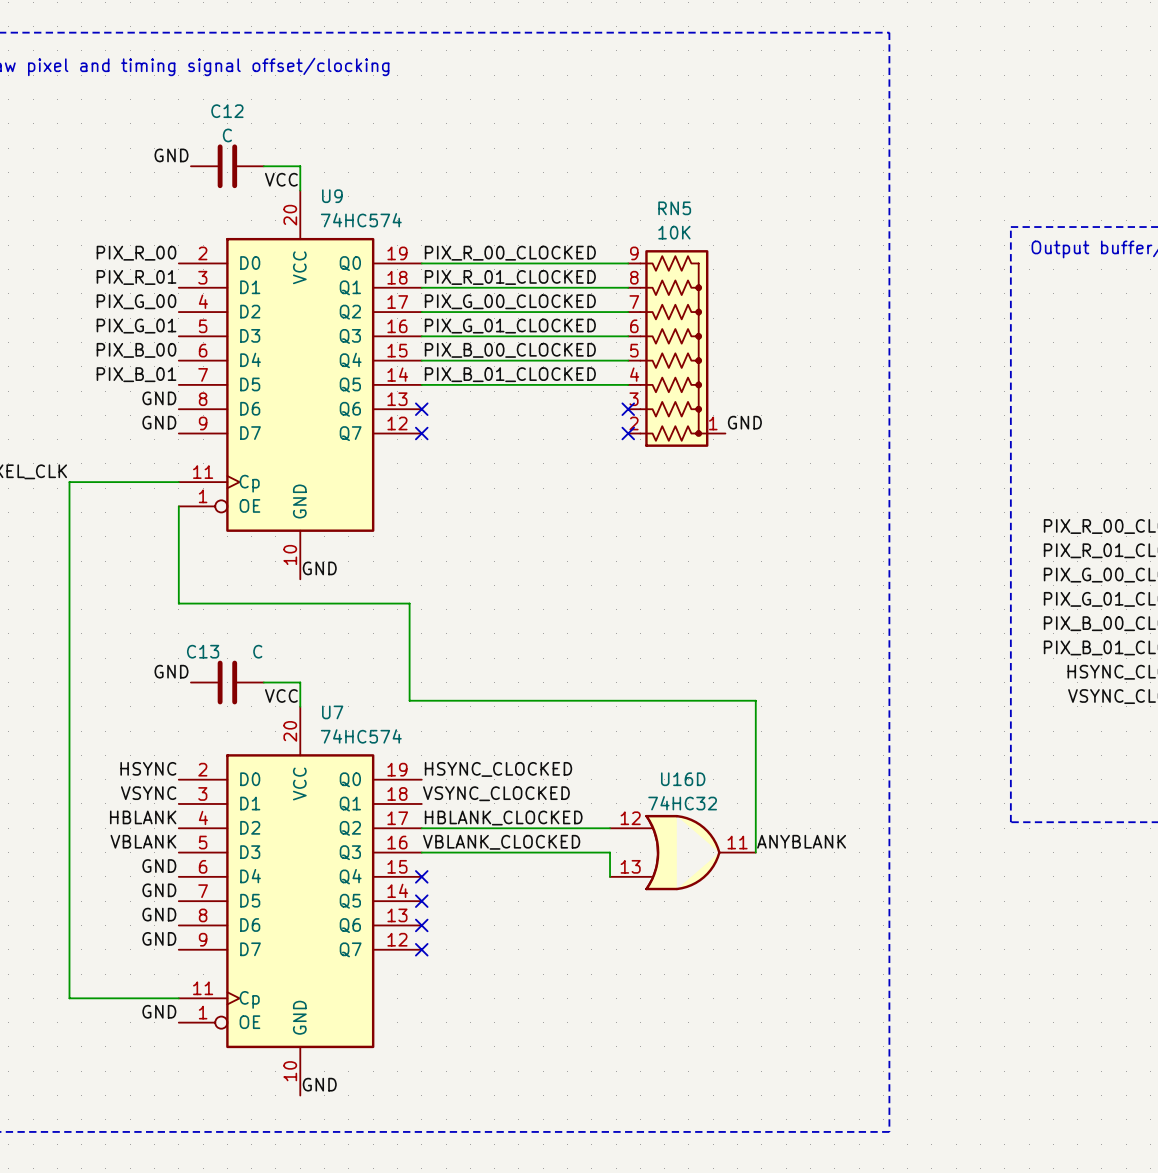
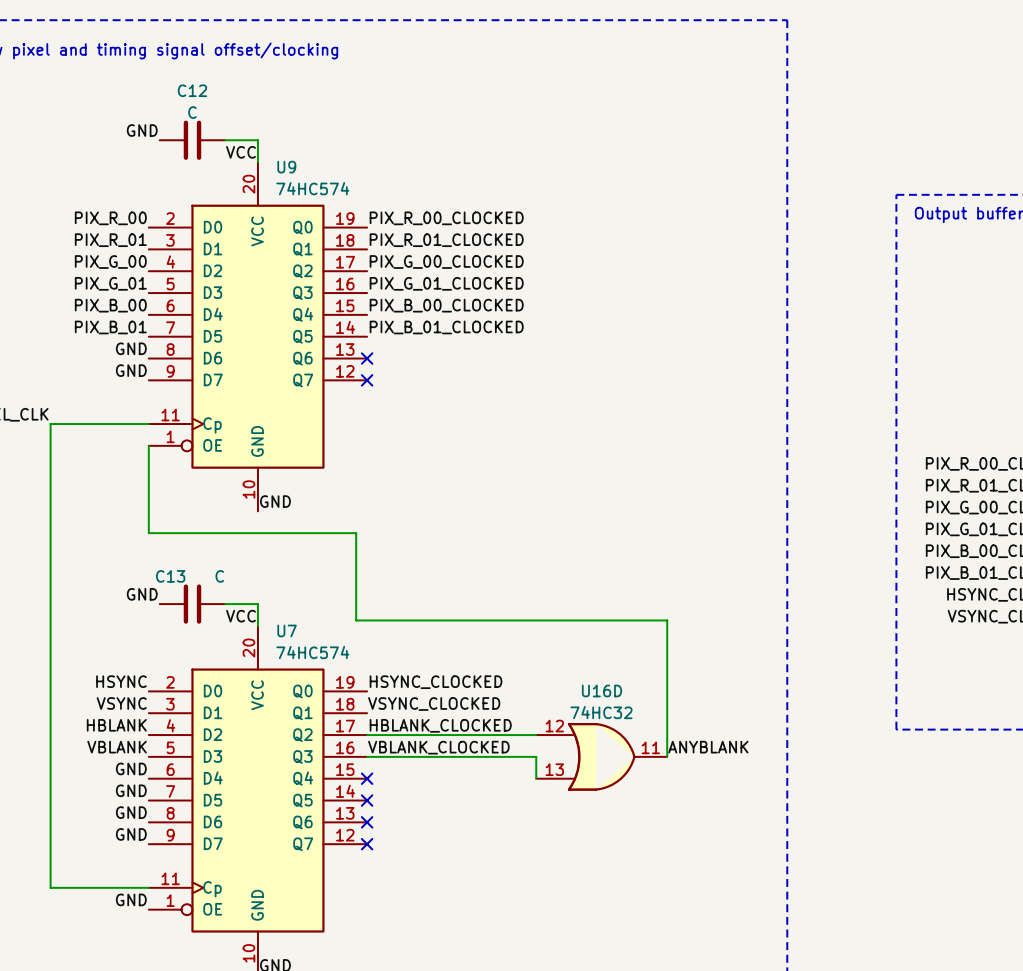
wire: (421, 263) (628, 263) -> none
wire: (421, 287) (628, 287) -> none
wire: (421, 312) (628, 312) -> none
wire: (421, 336) (628, 336) -> none
RN5: 10K (676, 348) -> none
wire: (421, 360) (628, 360) -> none
wire: (421, 384) (628, 384) -> none
no-connect mark: (628, 409) -> none
label: GND (744, 422) -> none
no-connect mark: (628, 433) -> none

